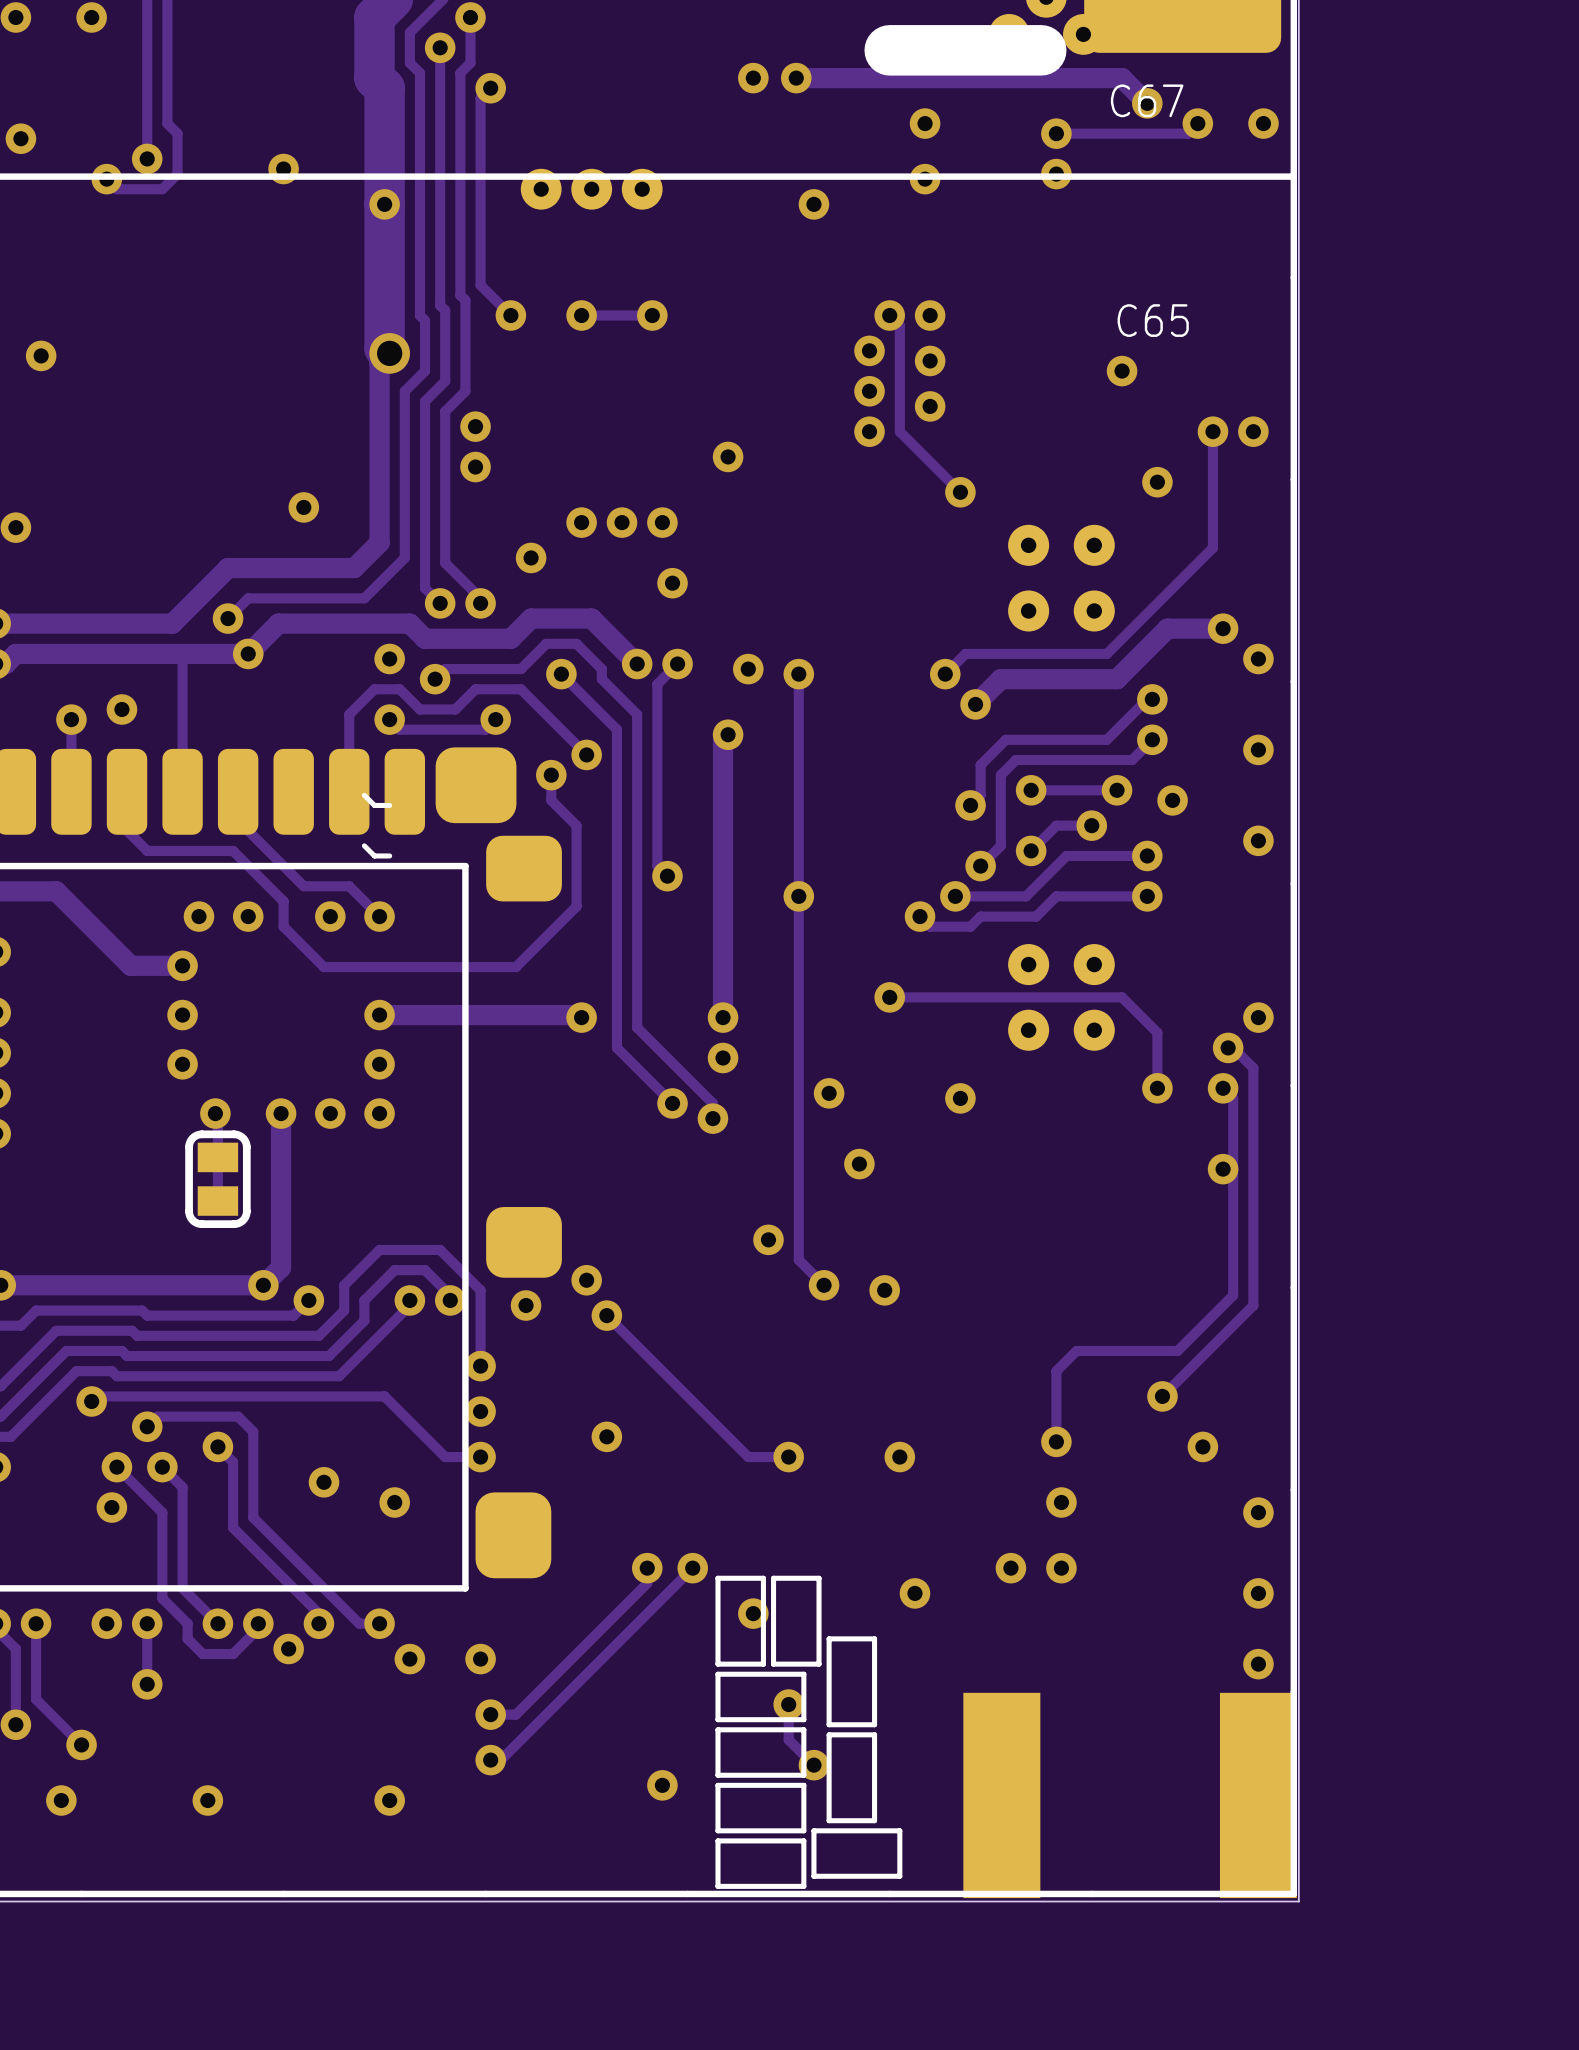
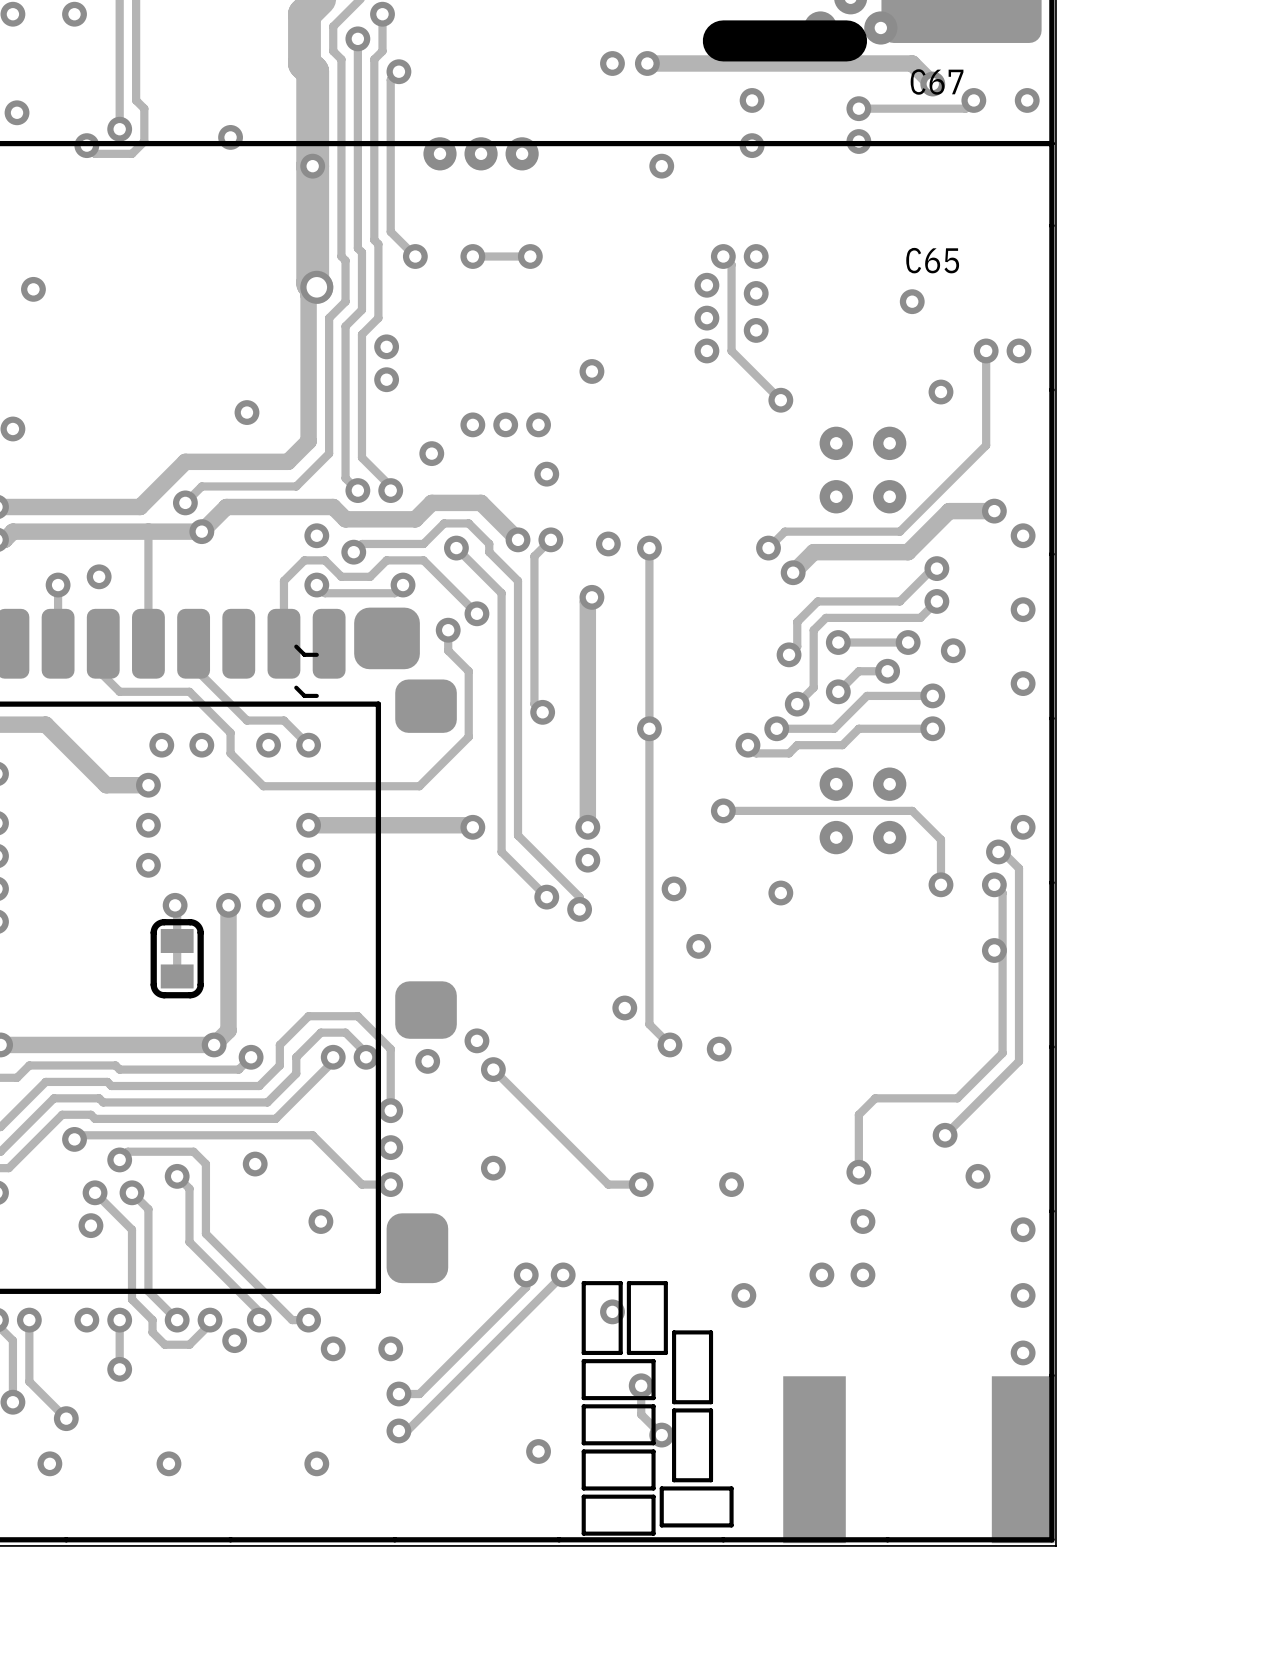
via position: (324, 1482) -> (255, 1164)

